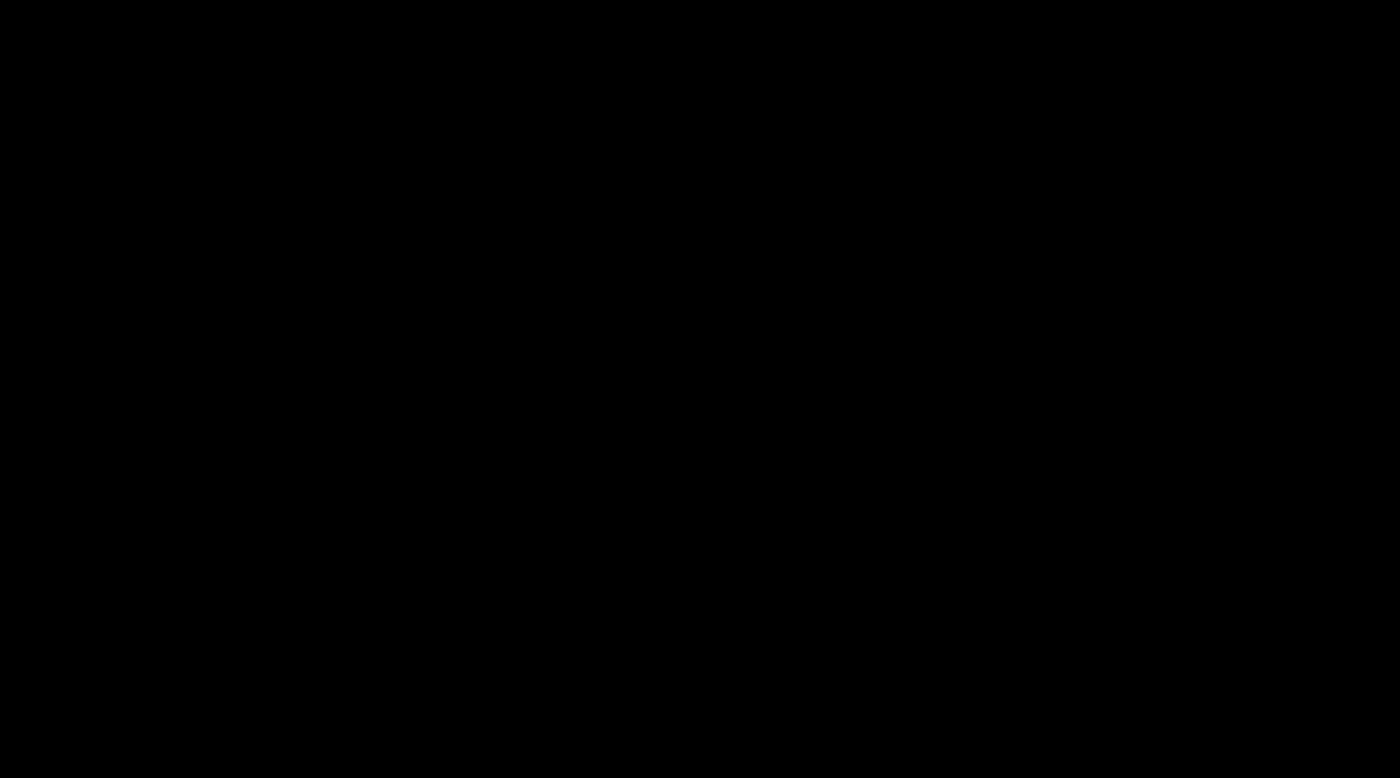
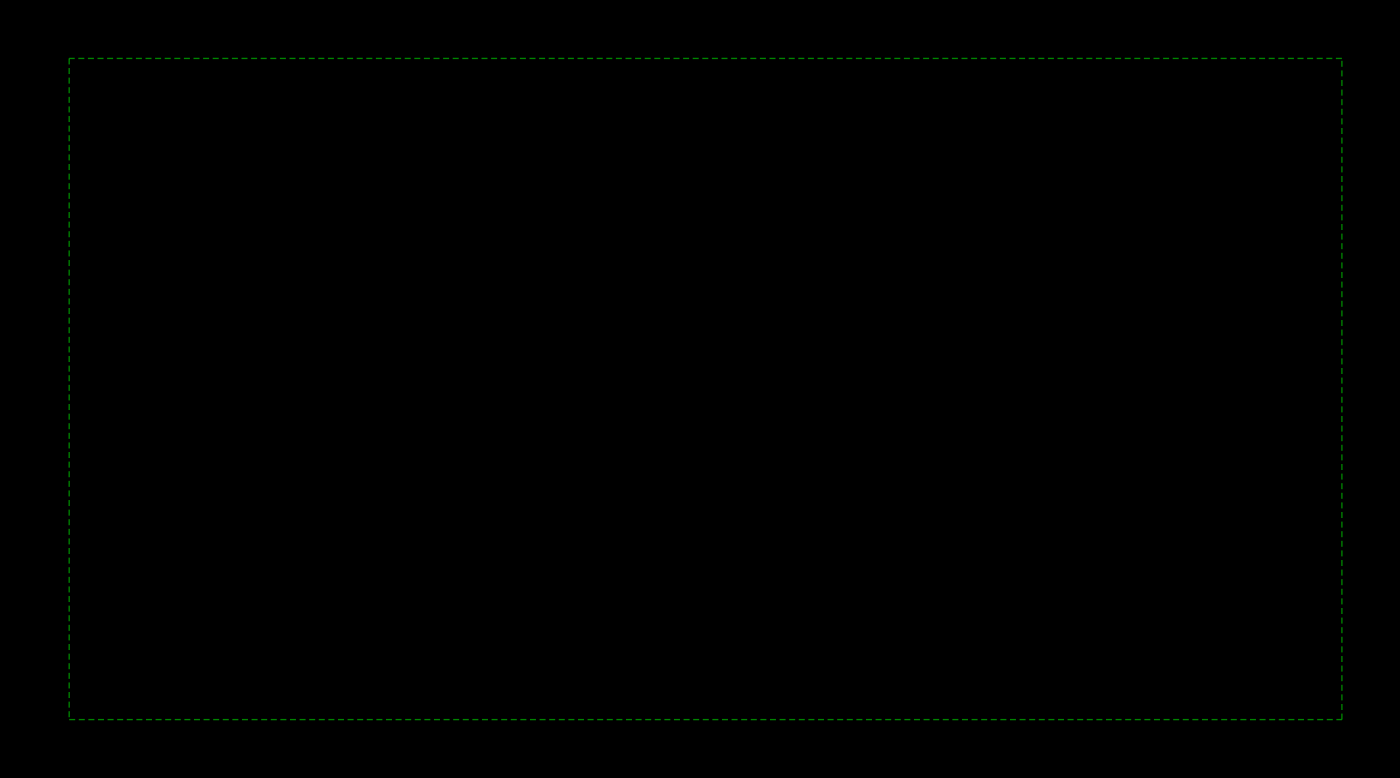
zone outline: none -> (1341, 58) (1341, 719) (69, 719) (69, 58) (1341, 58)

